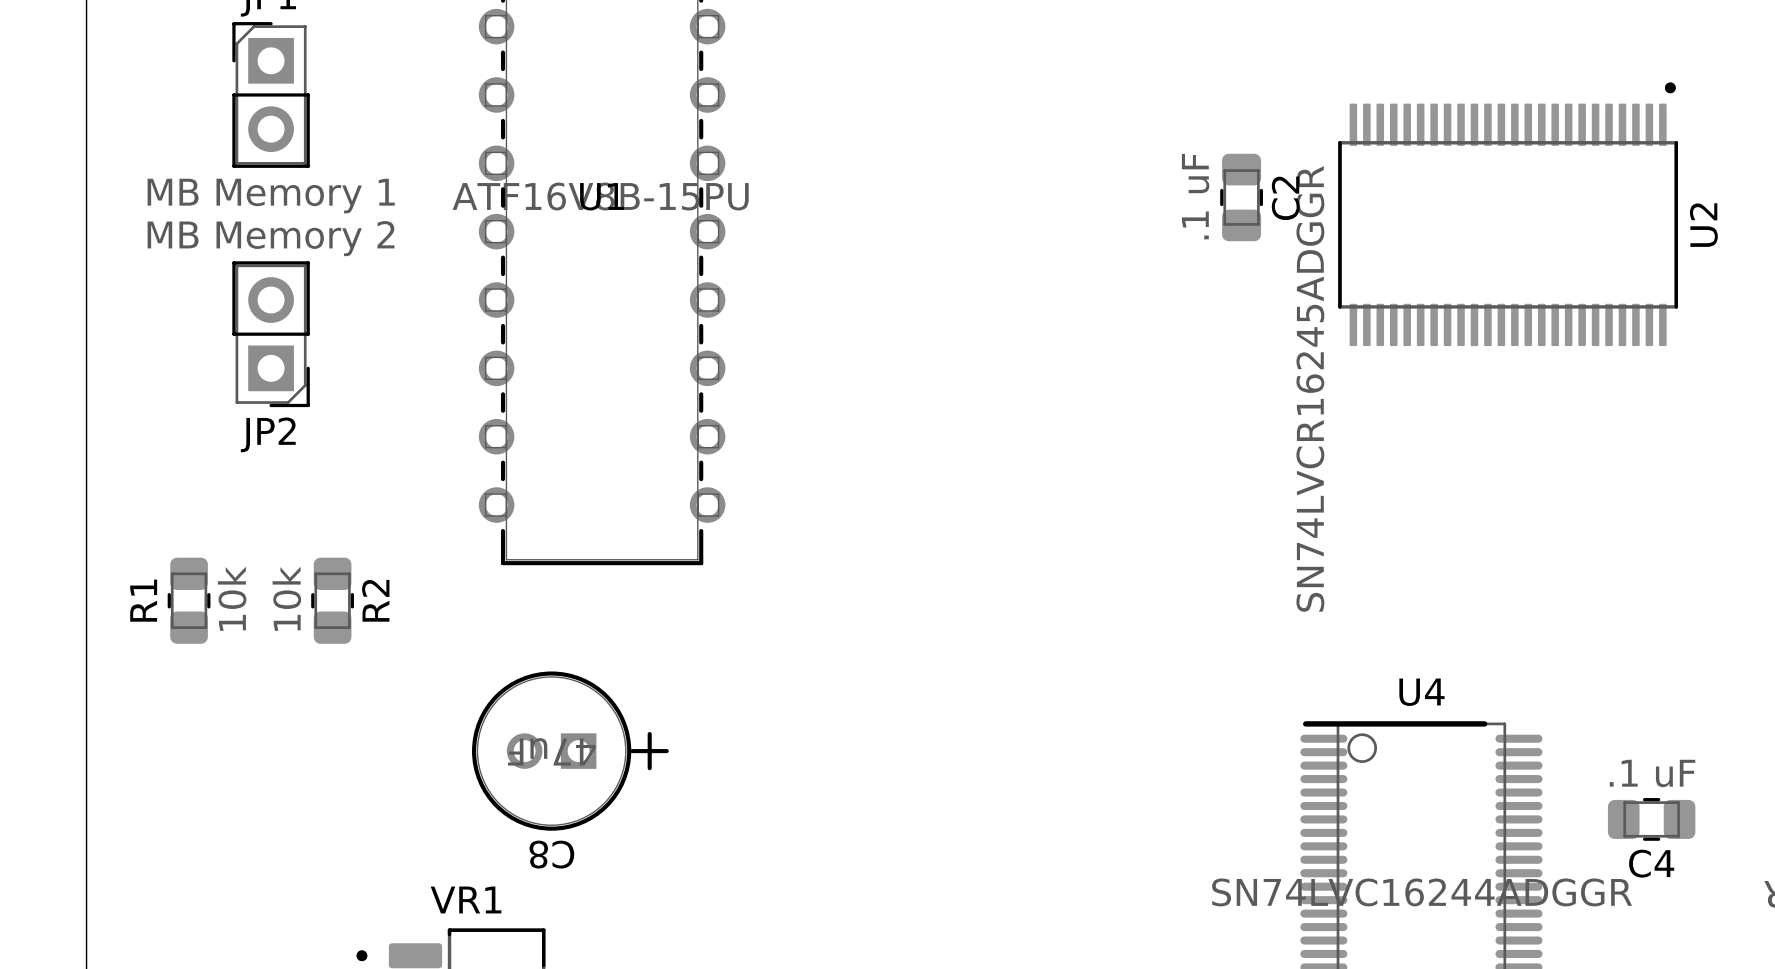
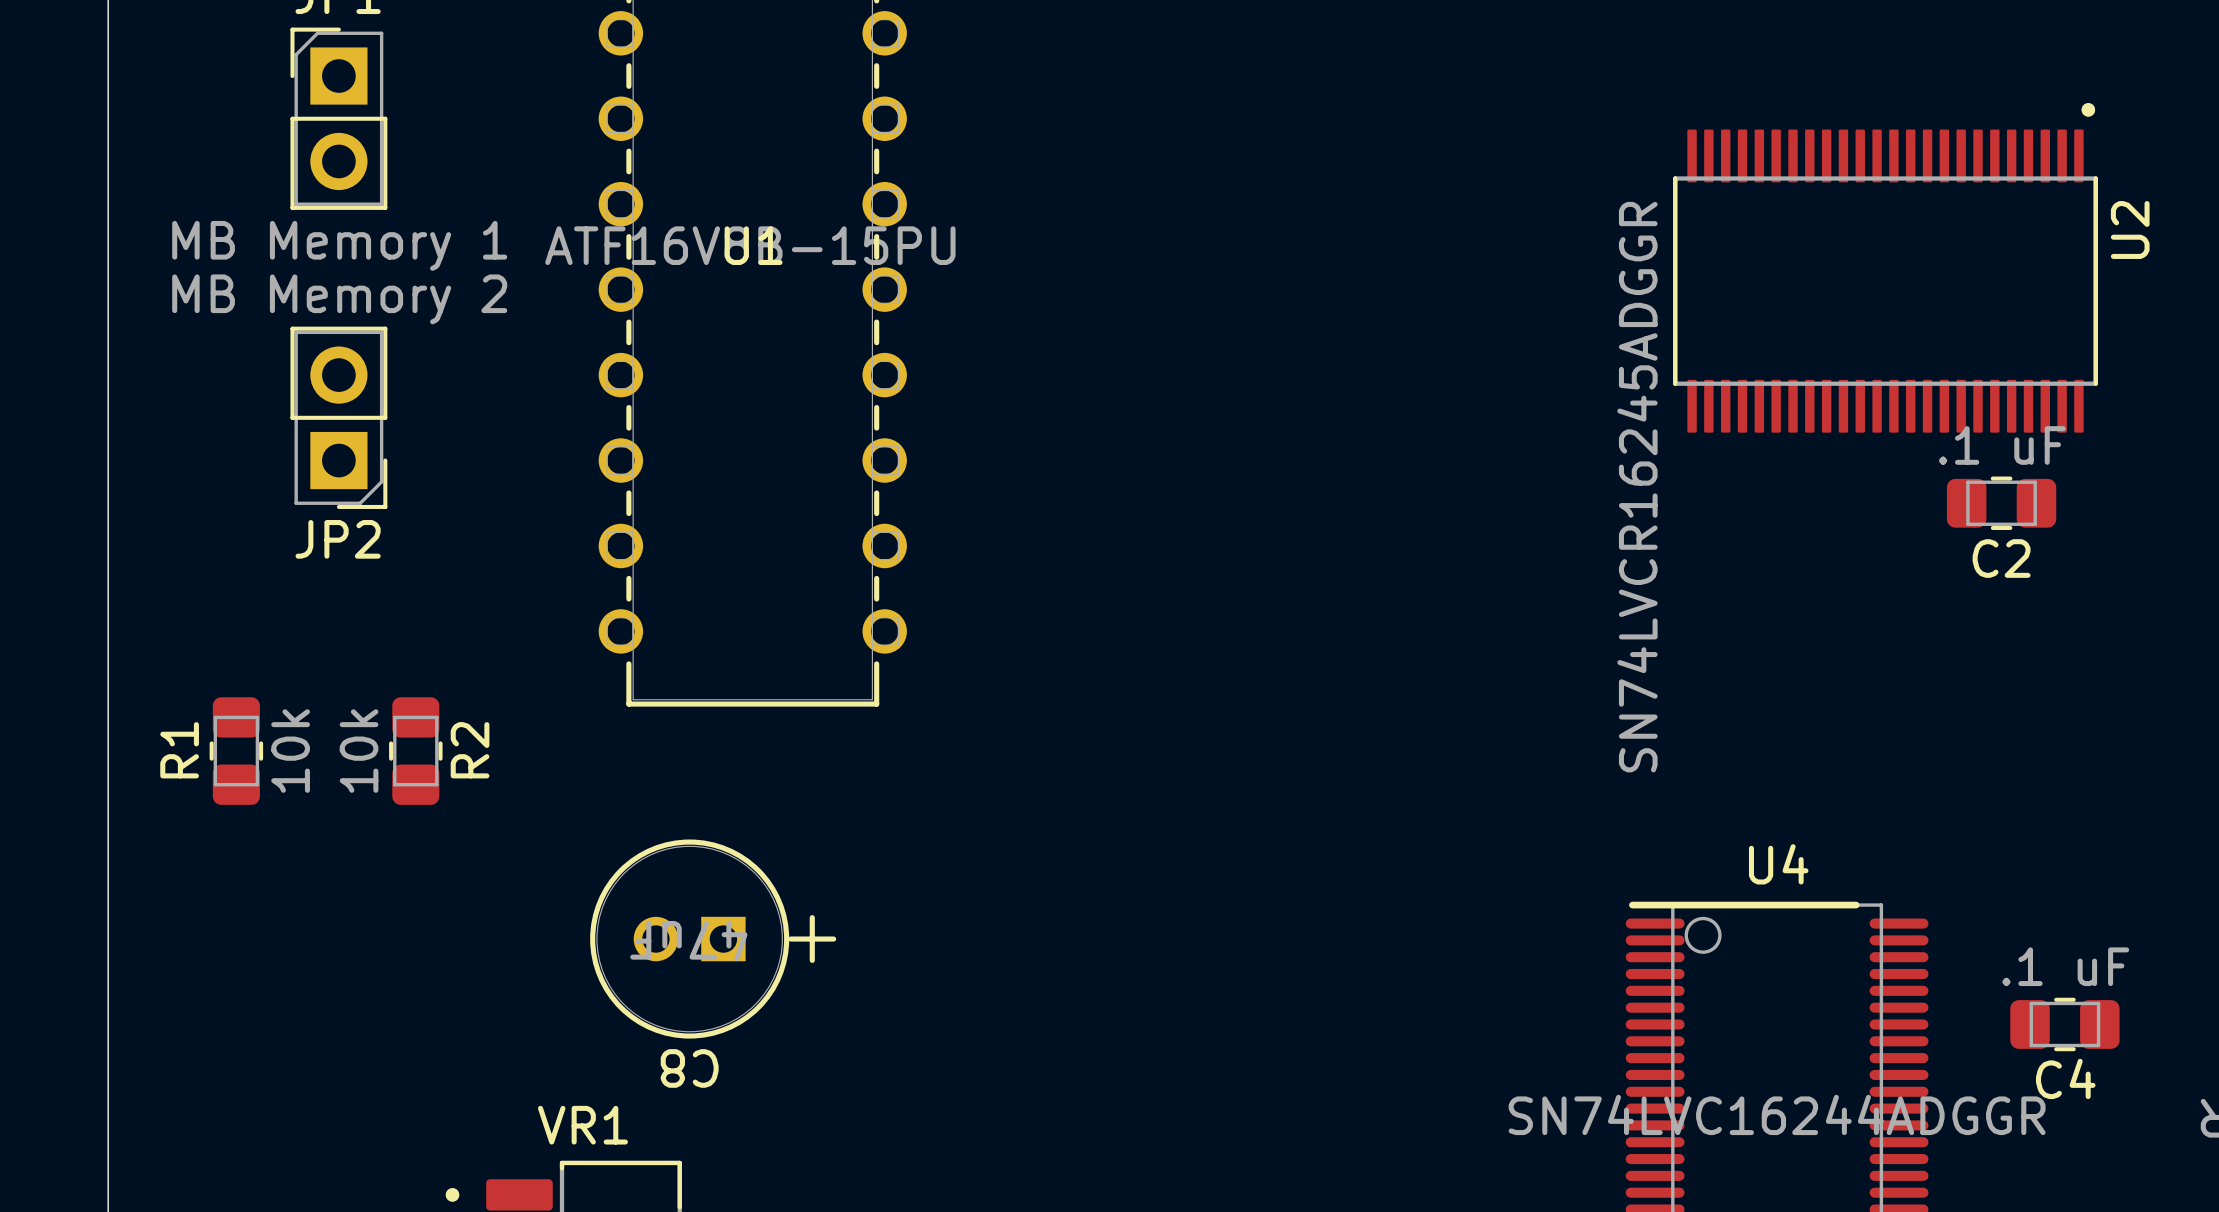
C2 rotation: 0° (1241, 197) -> 90° clockwise (2001, 503)
C2 position: (1241, 197) -> (2001, 503)
U2 name position: U2 (1703, 225) -> U2 (2130, 230)

